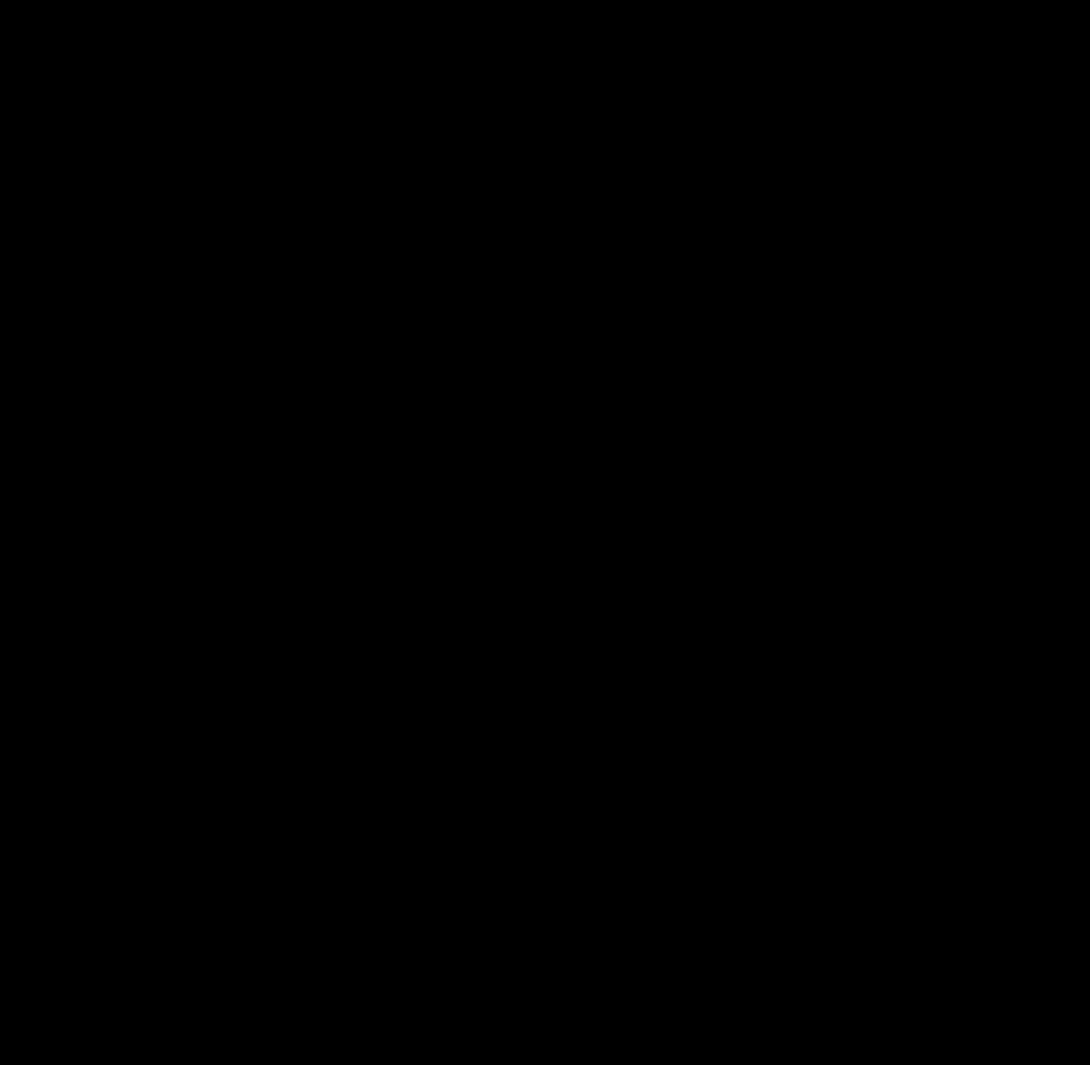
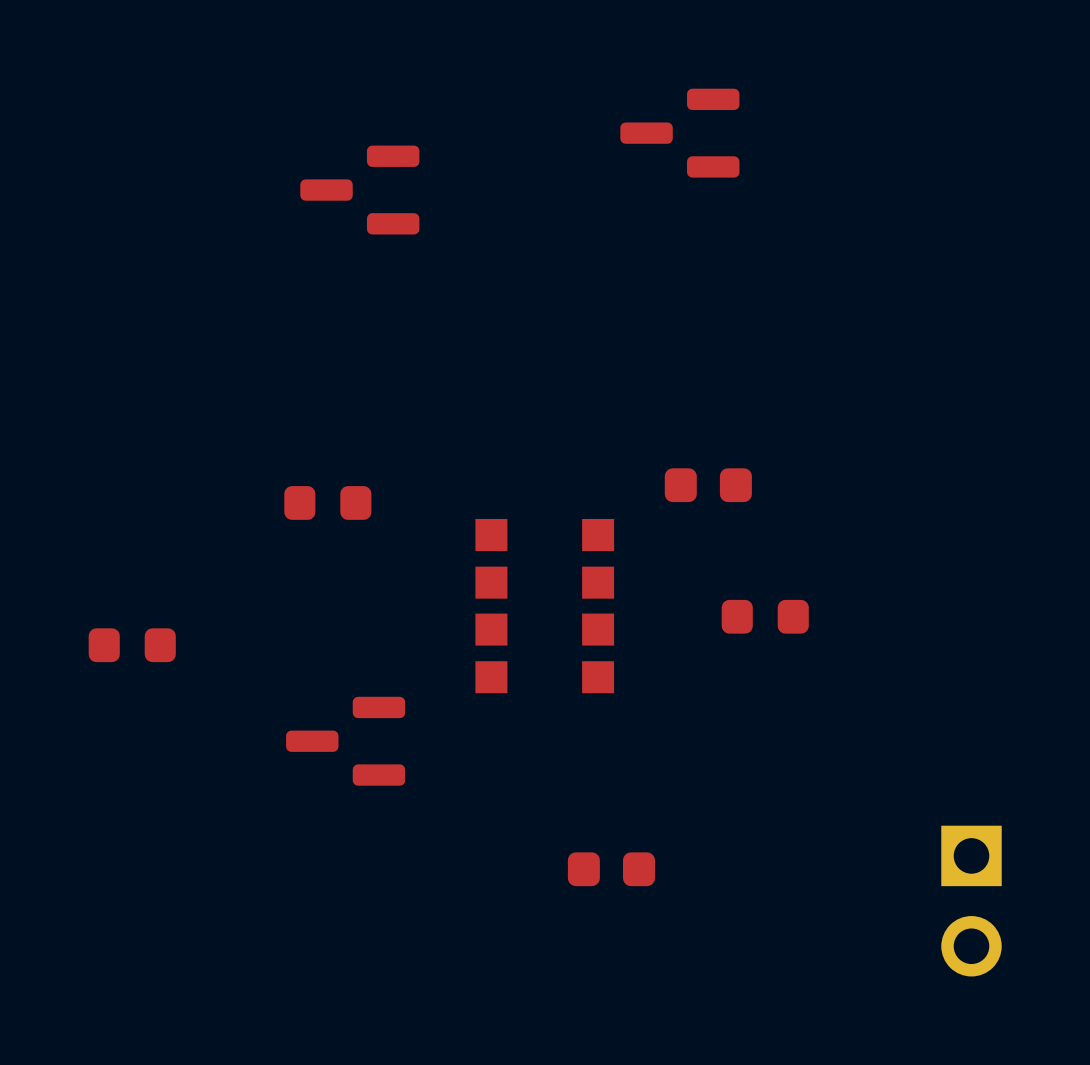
part: none -> (679, 133)
part: none -> (359, 190)
part: none -> (708, 485)
part: none -> (327, 502)
part: none -> (544, 606)
part: none -> (765, 616)
part: none -> (132, 645)
part: none -> (345, 741)
part: none -> (611, 869)
part: none -> (971, 901)

